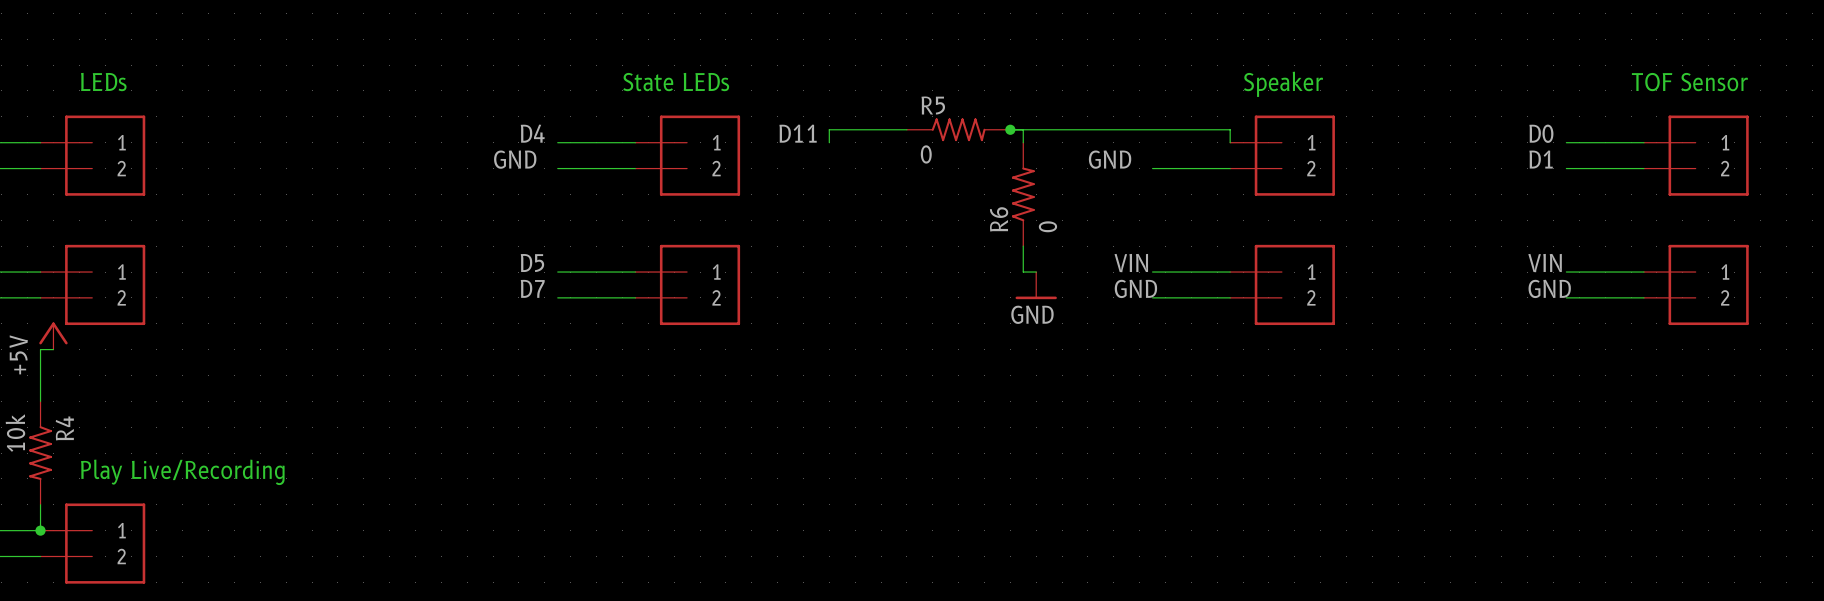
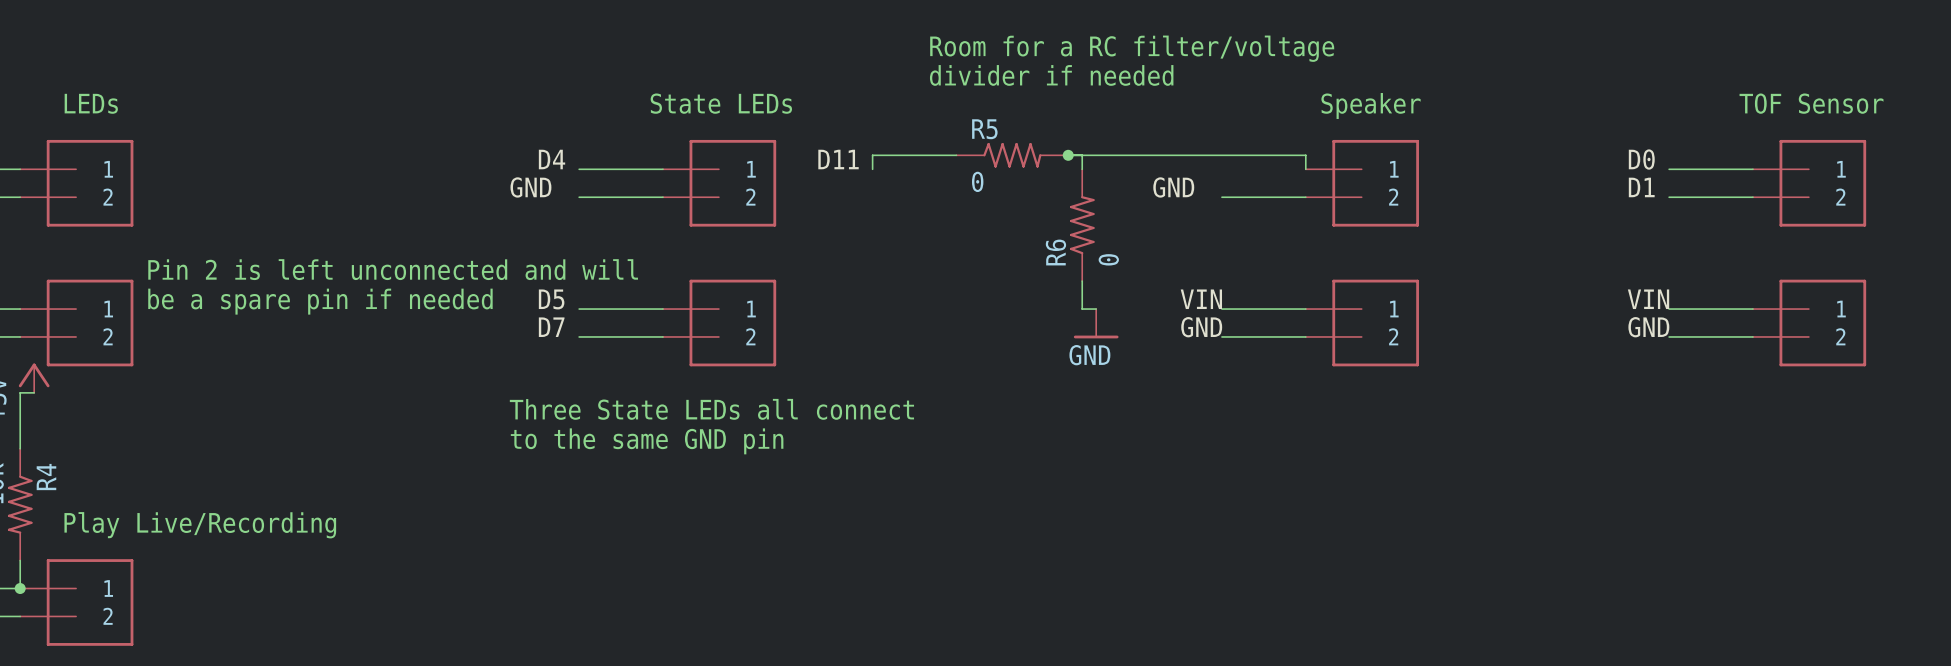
text: none -> Room for a RC filter/voltage (1132, 48)
text: none -> divider if needed (1051, 75)
text: none -> Pin 2 is left unconnected and will (393, 269)
text: none -> be a spare pin if needed (320, 301)
text: none -> Three State LEDs all connect (711, 409)
text: none -> to the same GND pin (647, 441)

